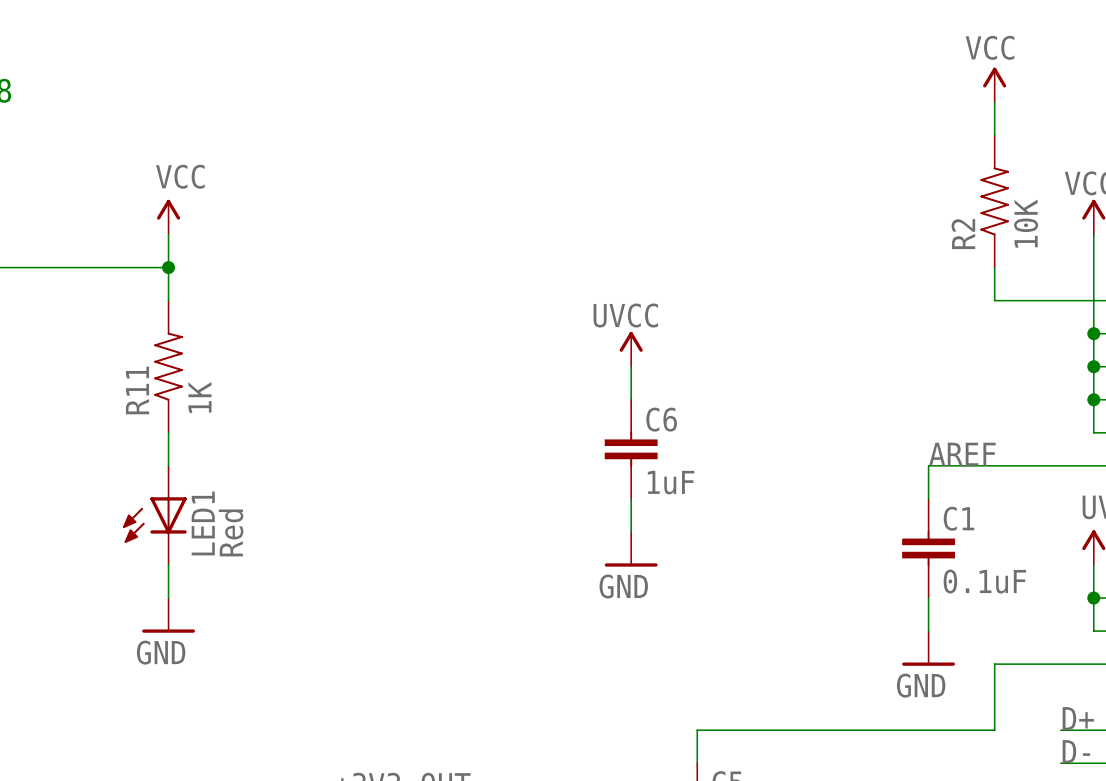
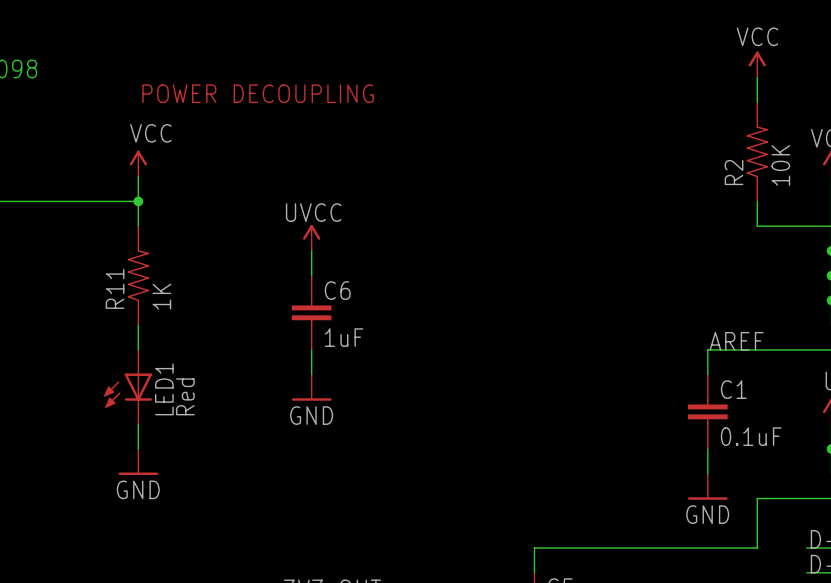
text: none -> POWER DECOUPLING (258, 93)
power symbol position: UVCC (631, 349) -> UVCC (311, 237)
wire: (631, 366) (631, 399) -> (311, 250) (311, 275)
C6 position: (631, 449) -> (311, 312)
wire: (631, 498) (631, 531) -> (311, 349) (311, 374)
power symbol position: GND (631, 549) -> GND (311, 387)

